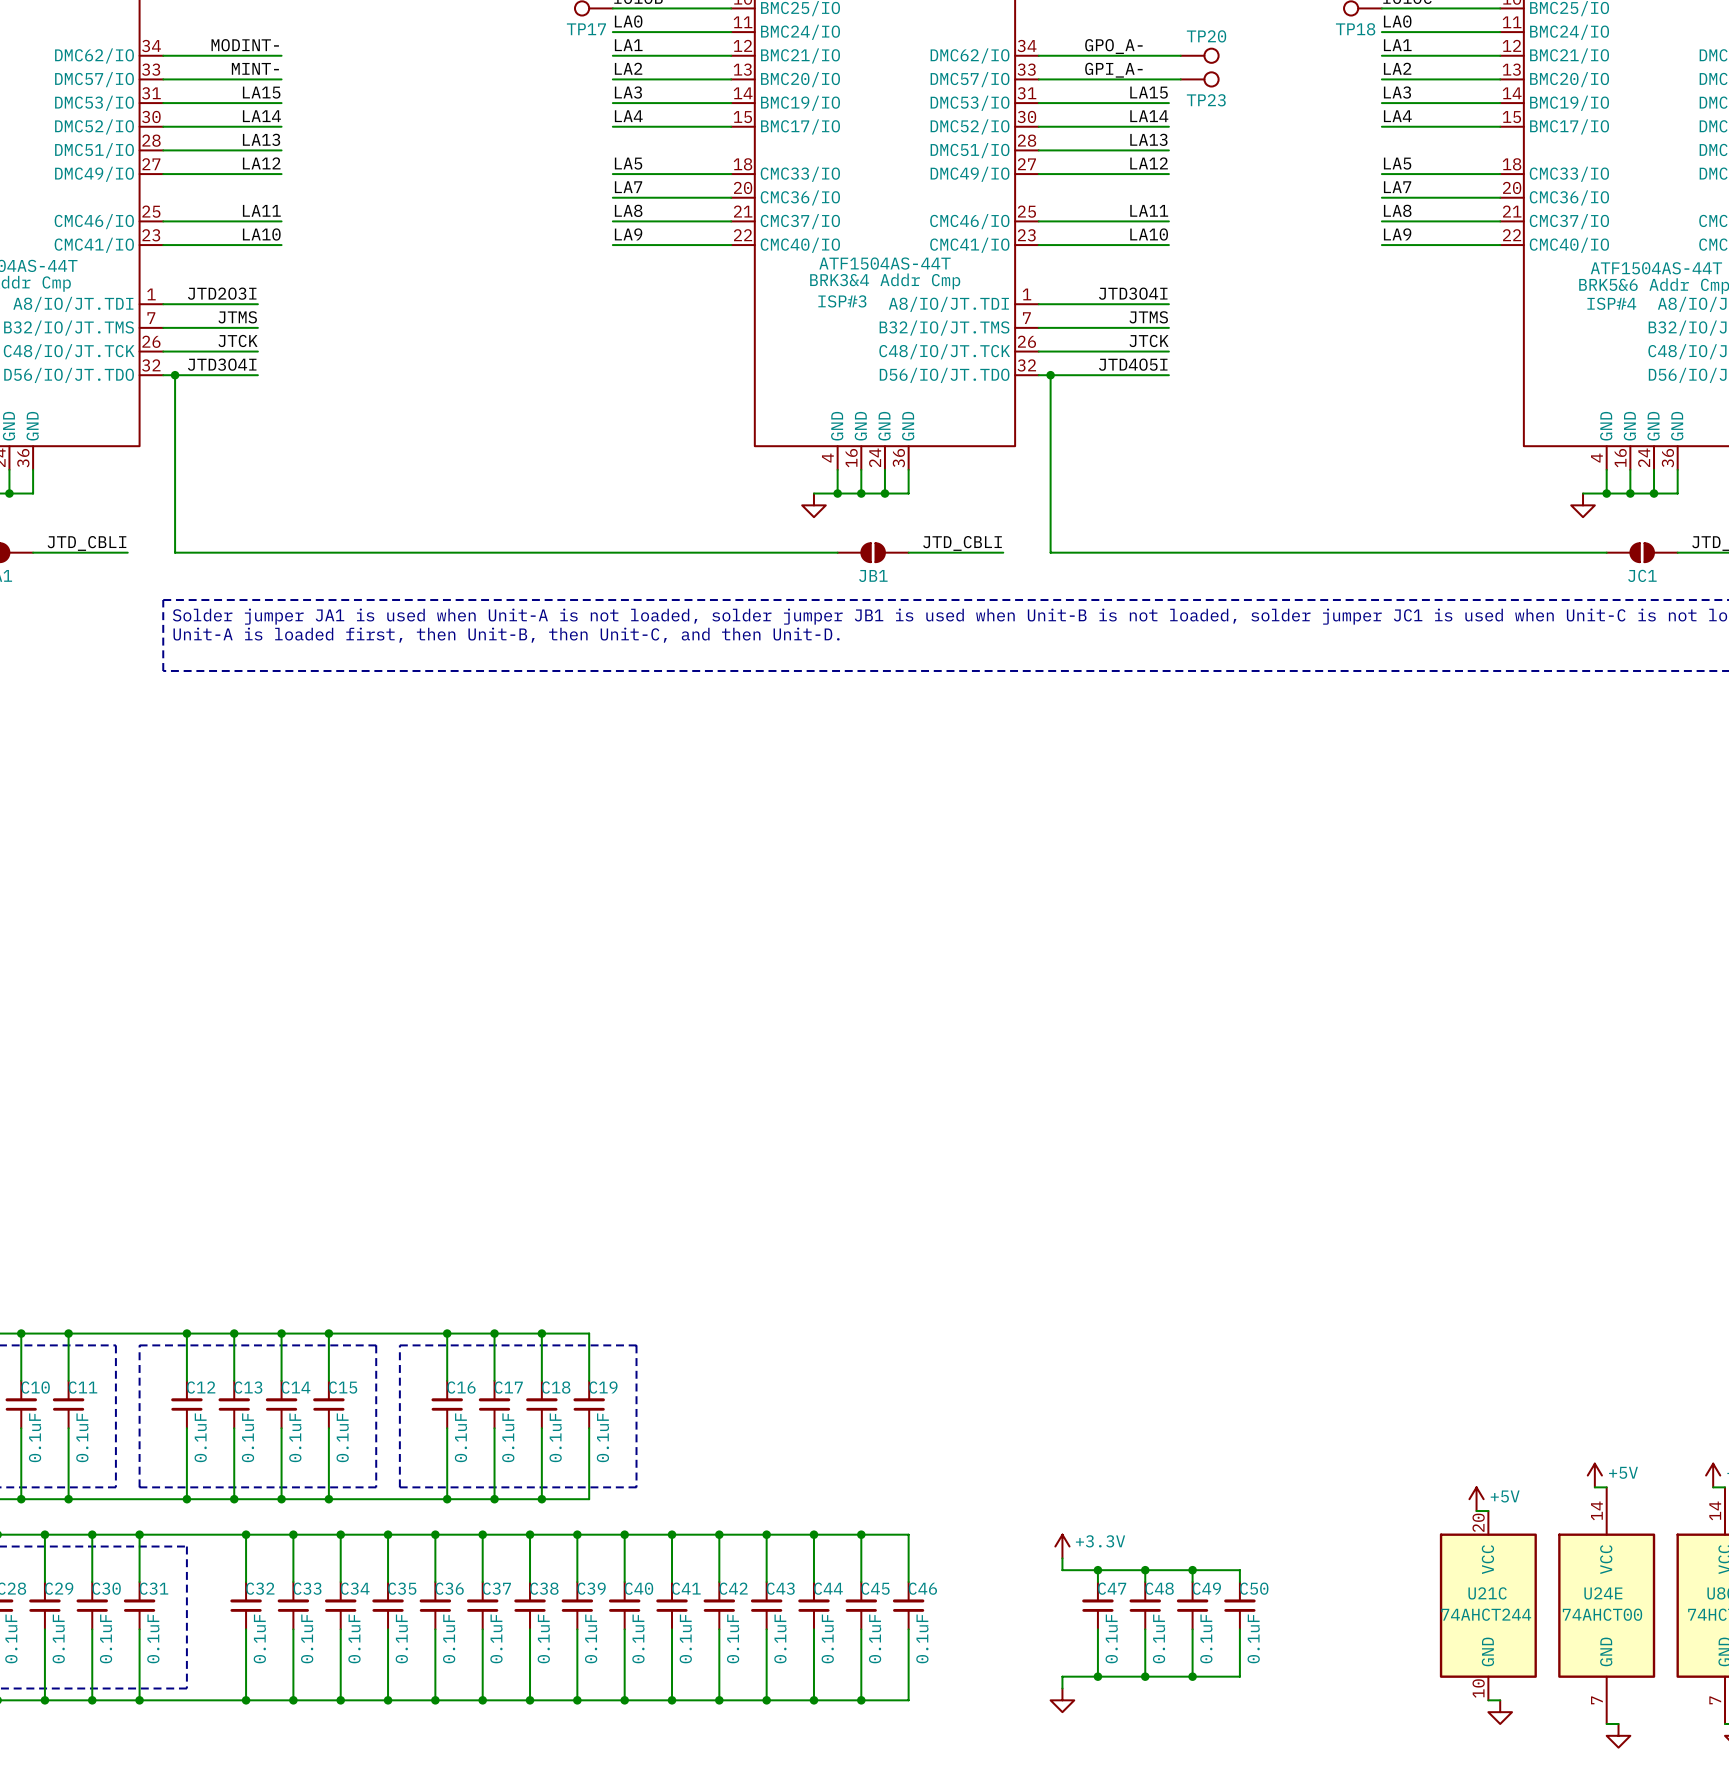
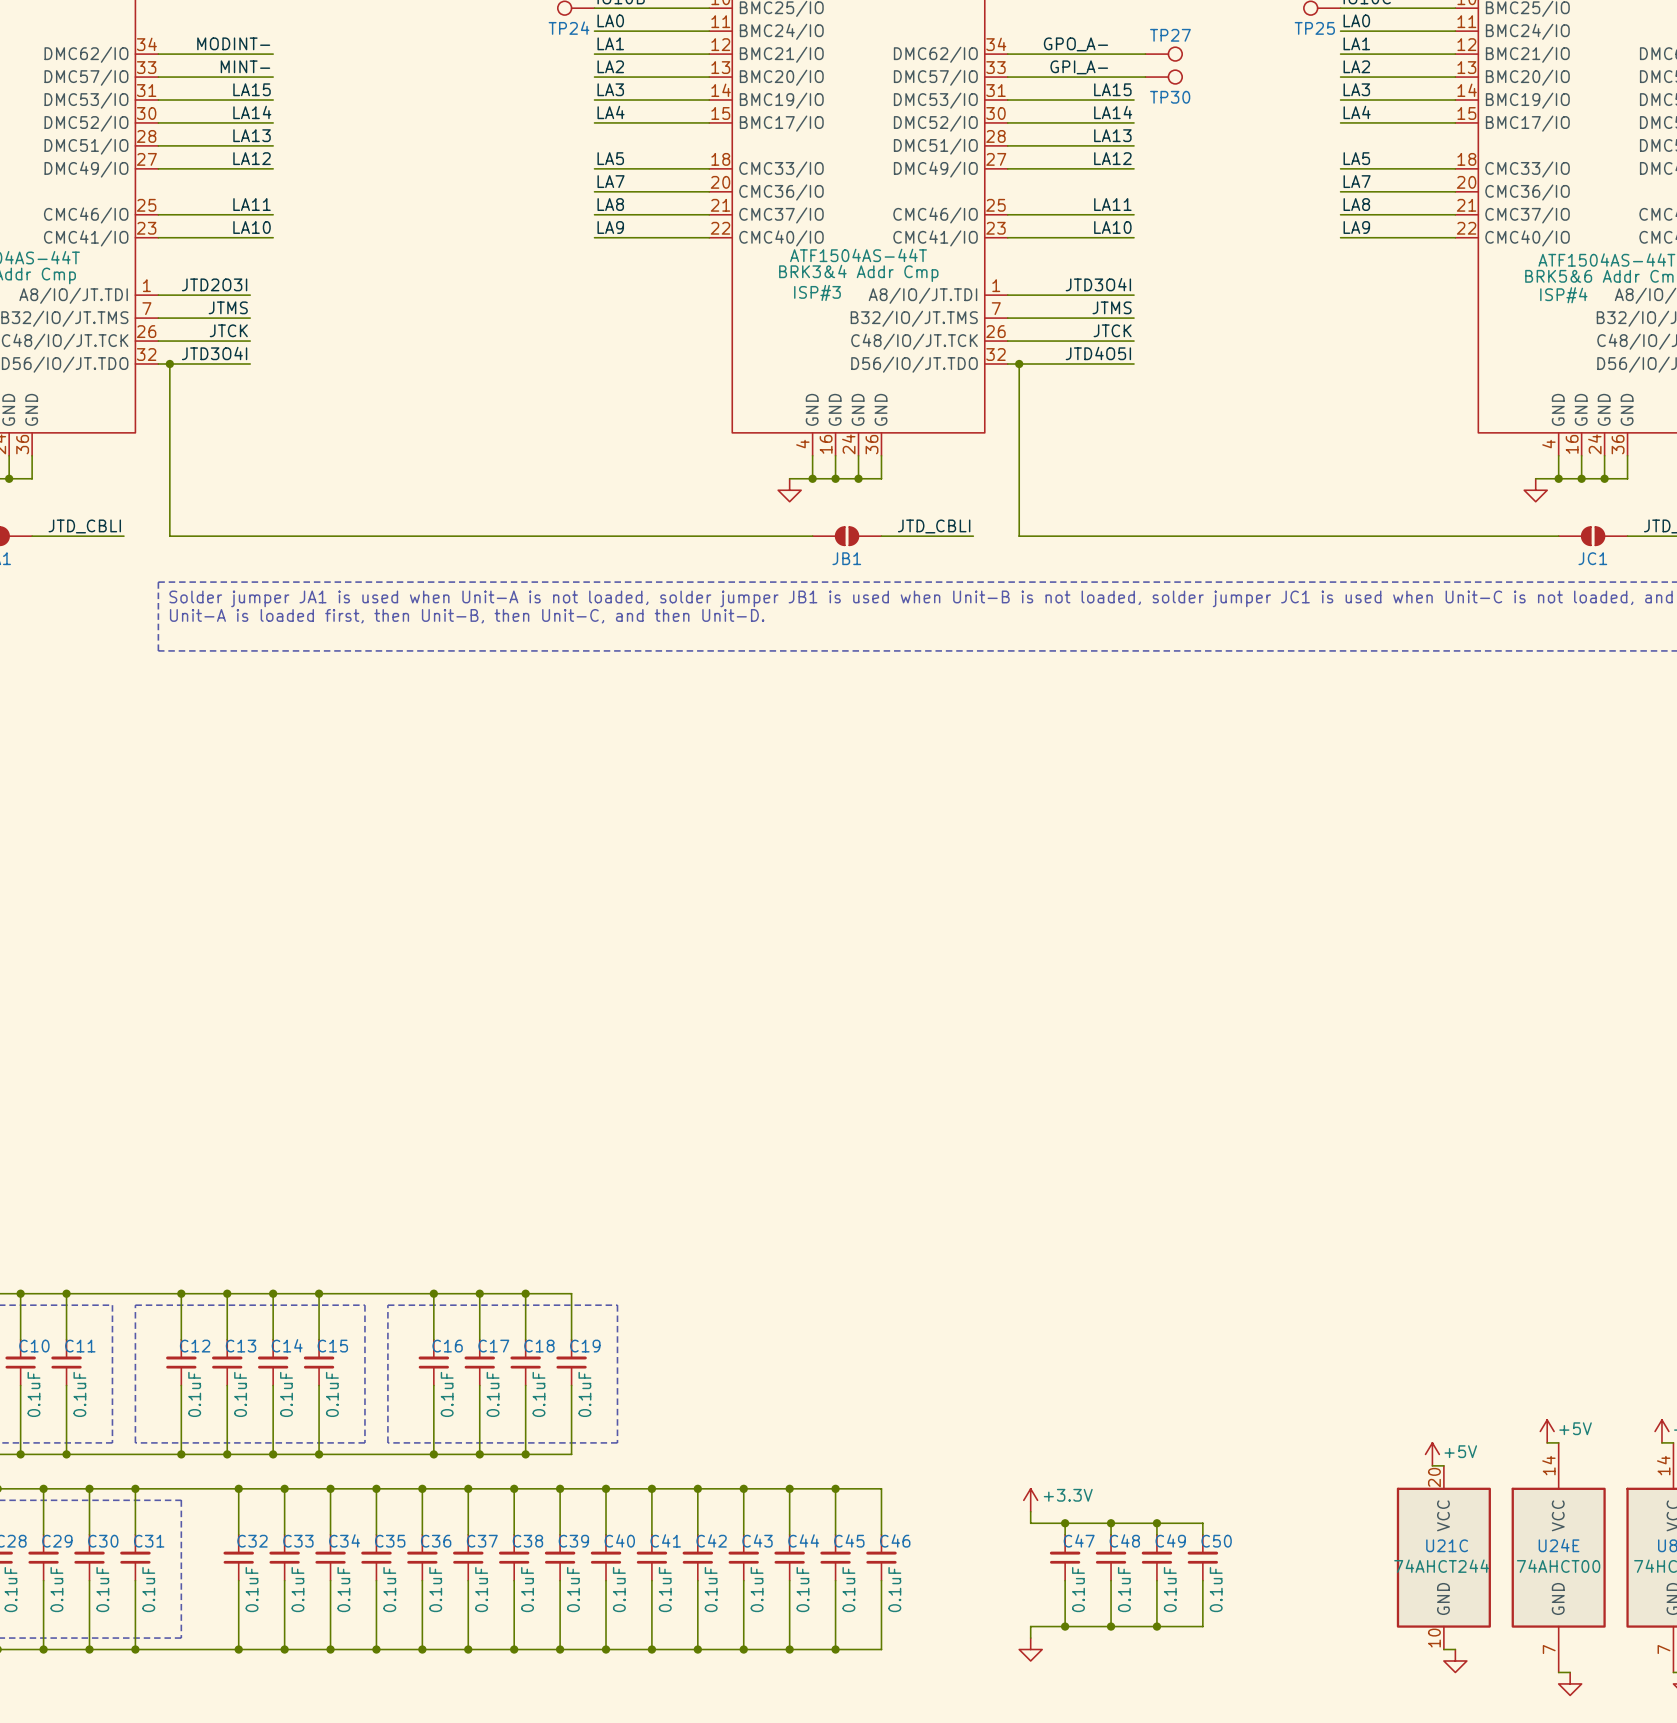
TP17 name: TP17 (586, 29) -> TP24 (569, 28)
TP18 name: TP18 (1355, 29) -> TP25 (1314, 28)
TP20 name: TP20 (1206, 36) -> TP27 (1170, 35)
TP23 name: TP23 (1206, 100) -> TP30 (1170, 97)

